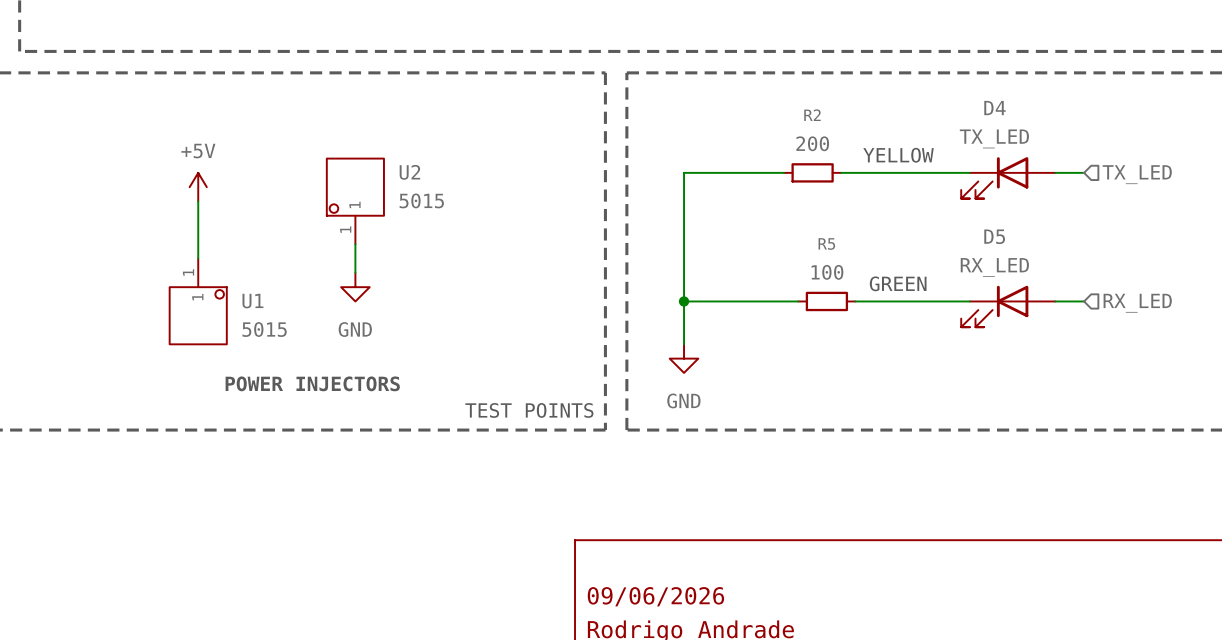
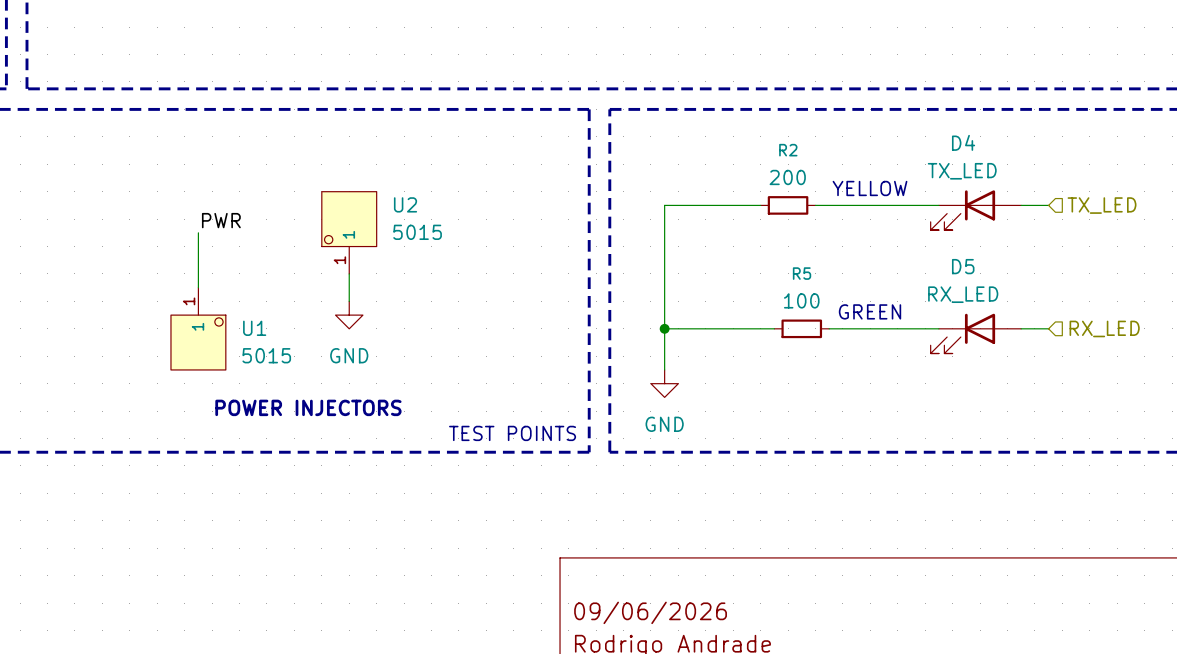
power symbol: +5V (198, 187) -> none
label: none -> PWR (221, 220)

